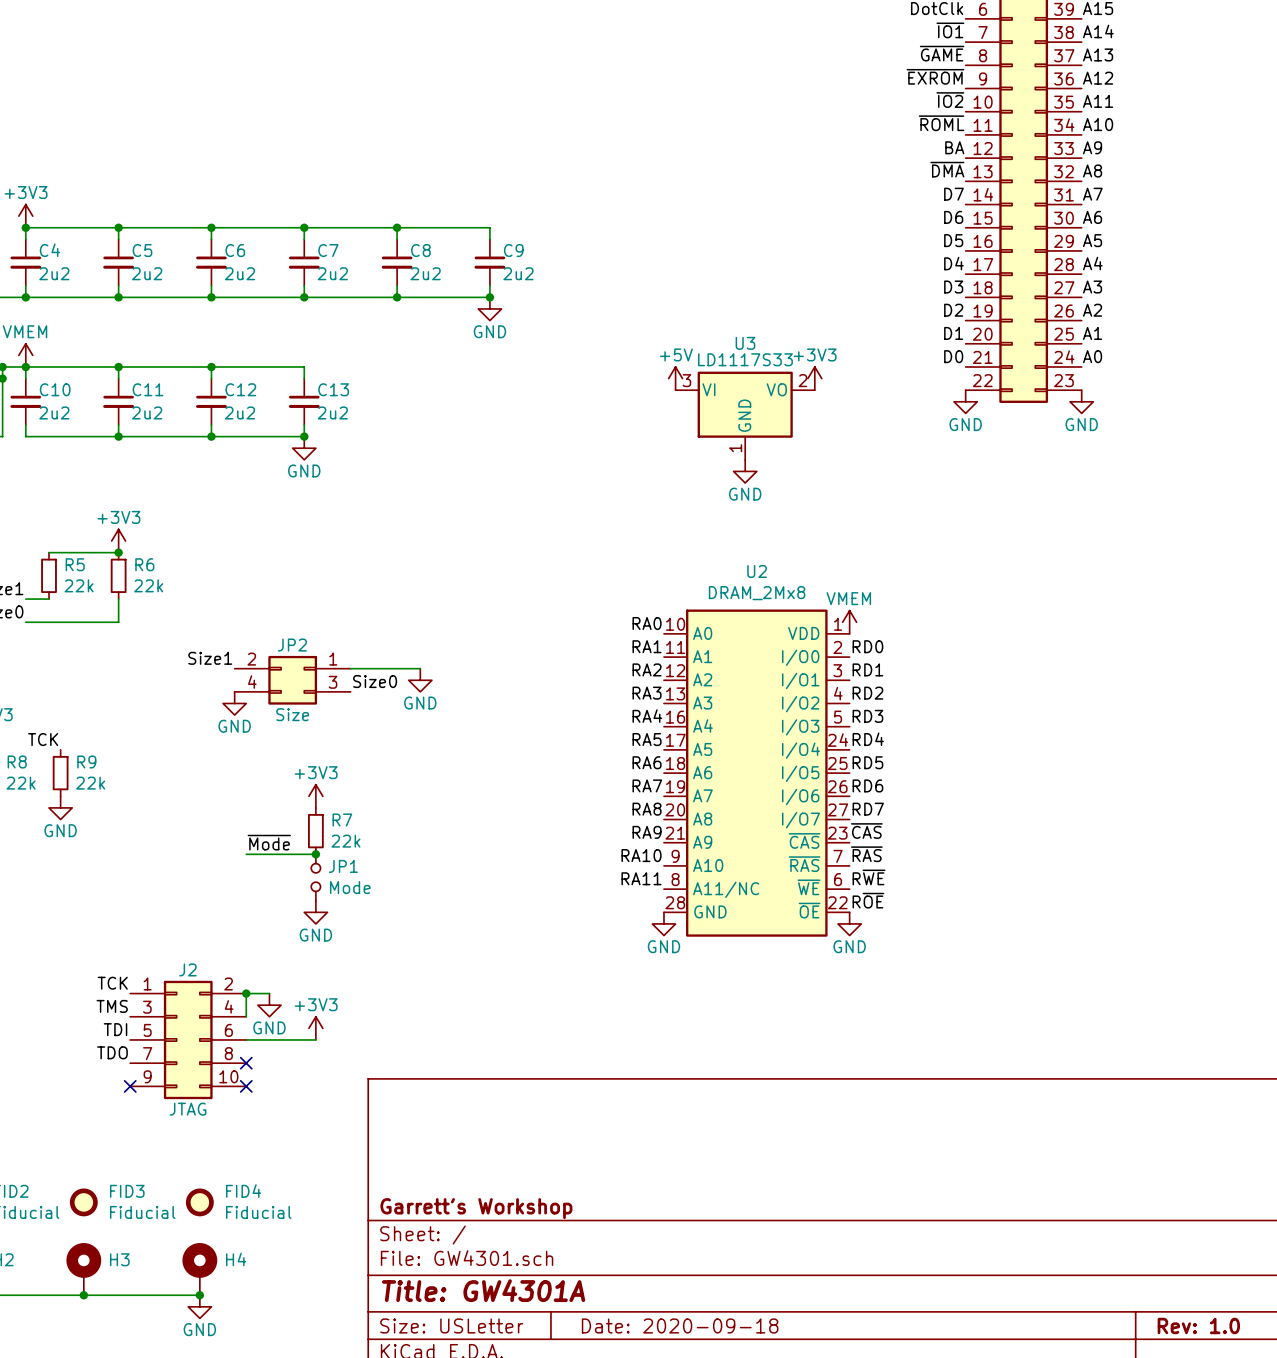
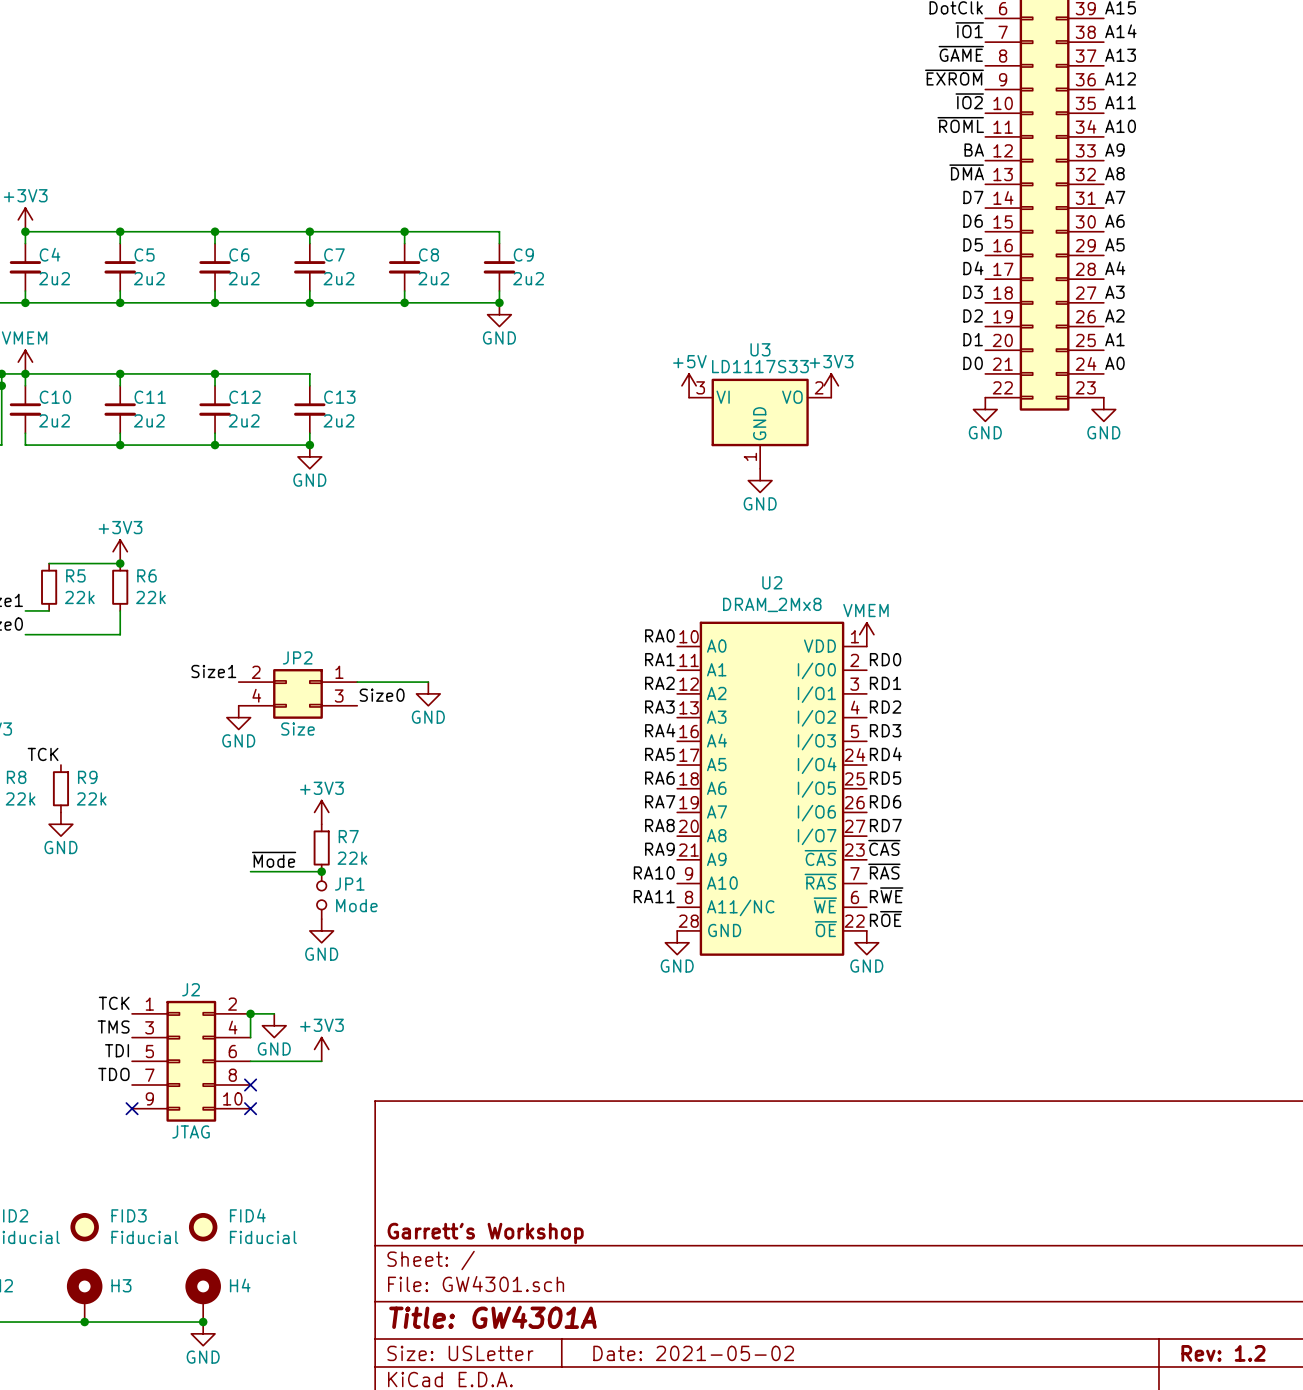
title block: Date: 2020-09-18 (680, 1325) -> Date: 2021-05-02 (693, 1353)
title block: Rev: 1.0 (1198, 1325) -> Rev: 1.2 (1223, 1353)

